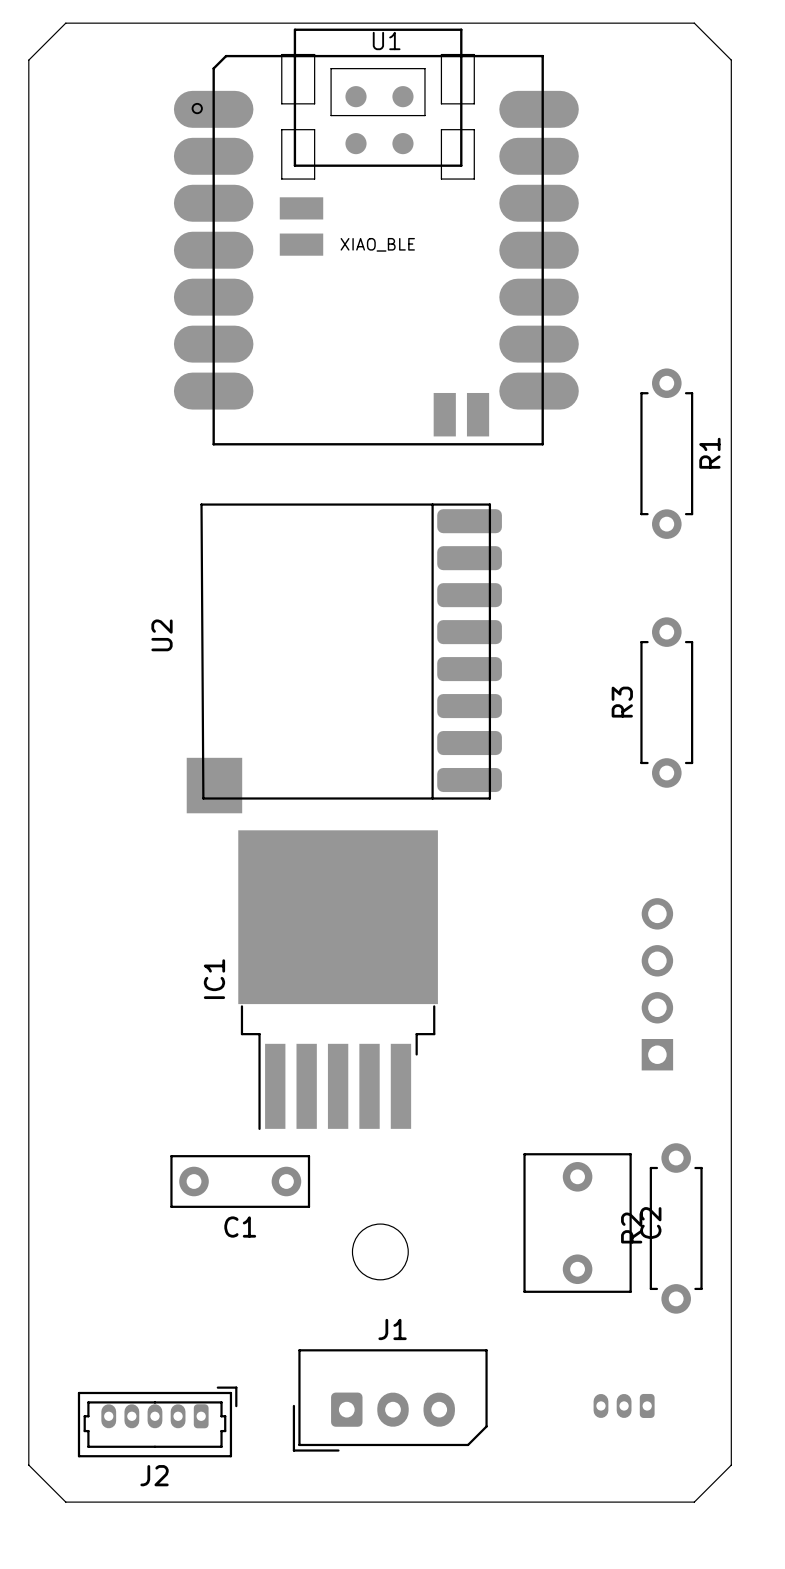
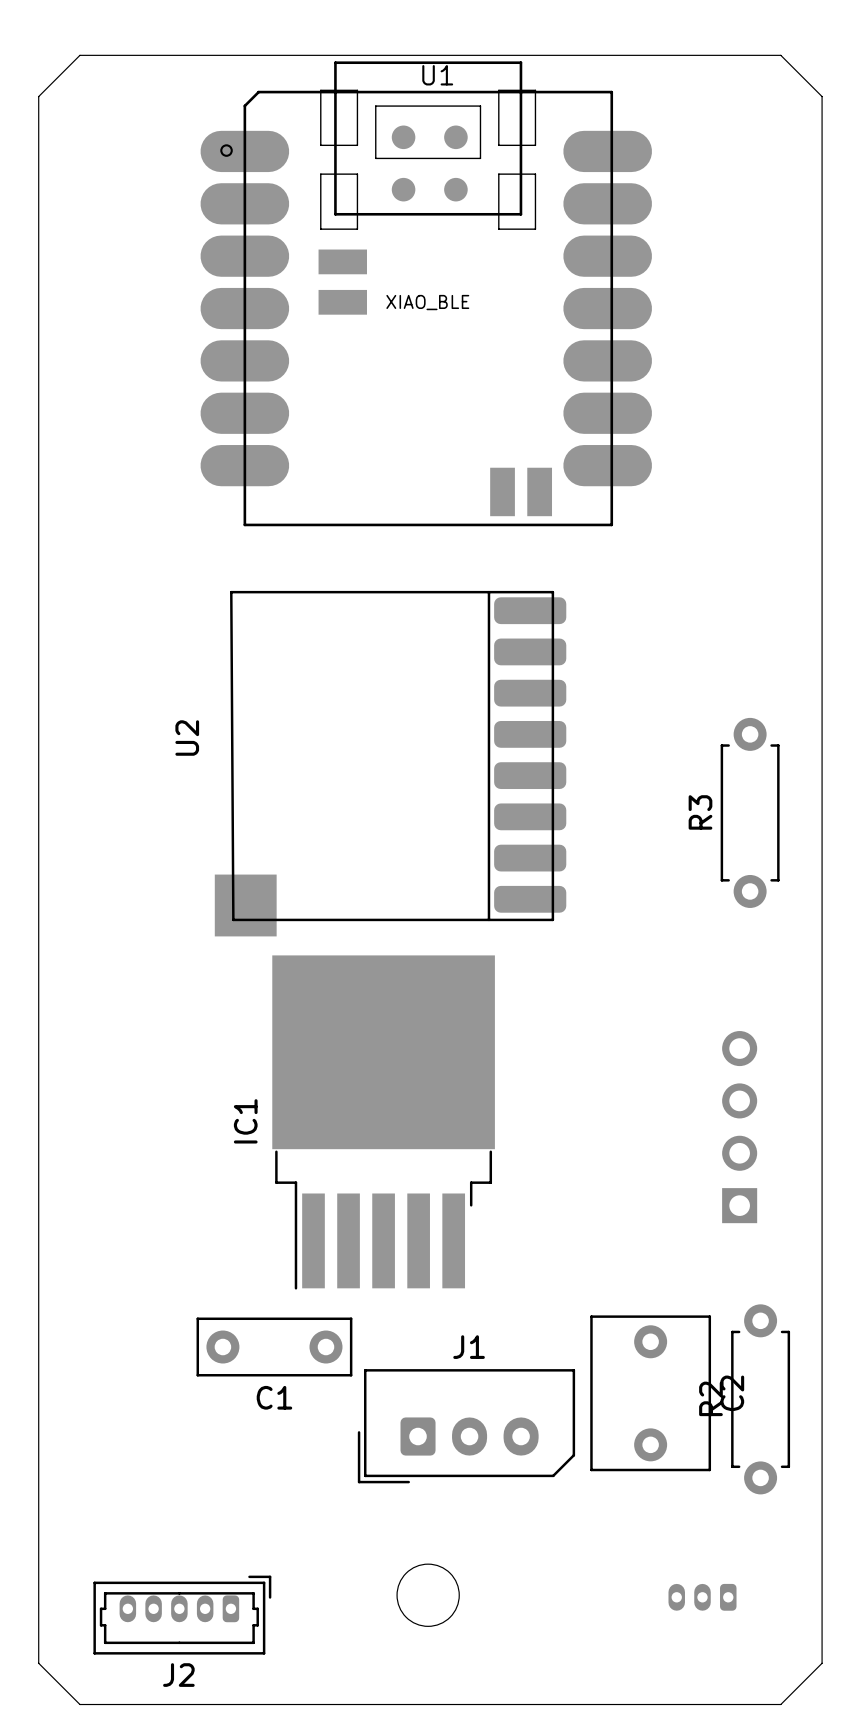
R1: (666, 453) -> none
round board edge position: (380, 1251) -> (428, 1595)
J1 position: (390, 1400) -> (466, 1426)

